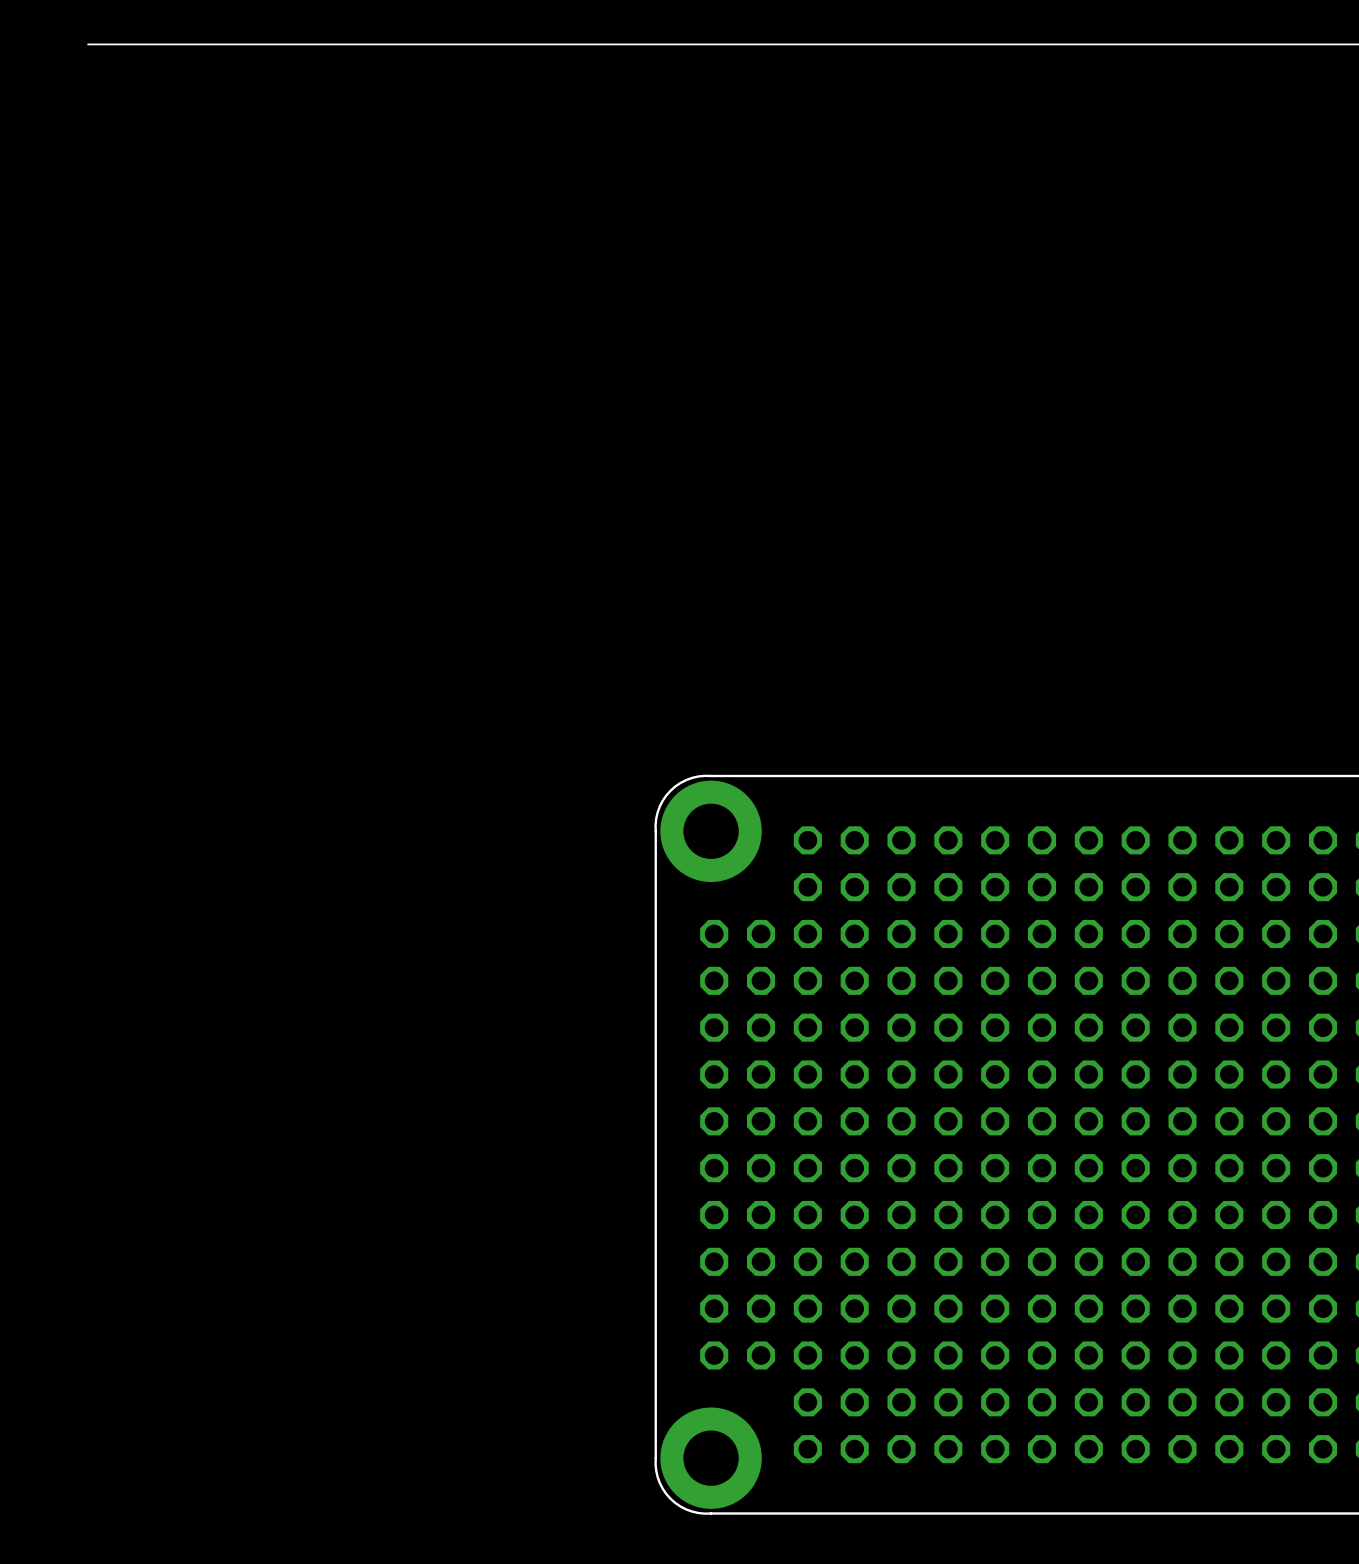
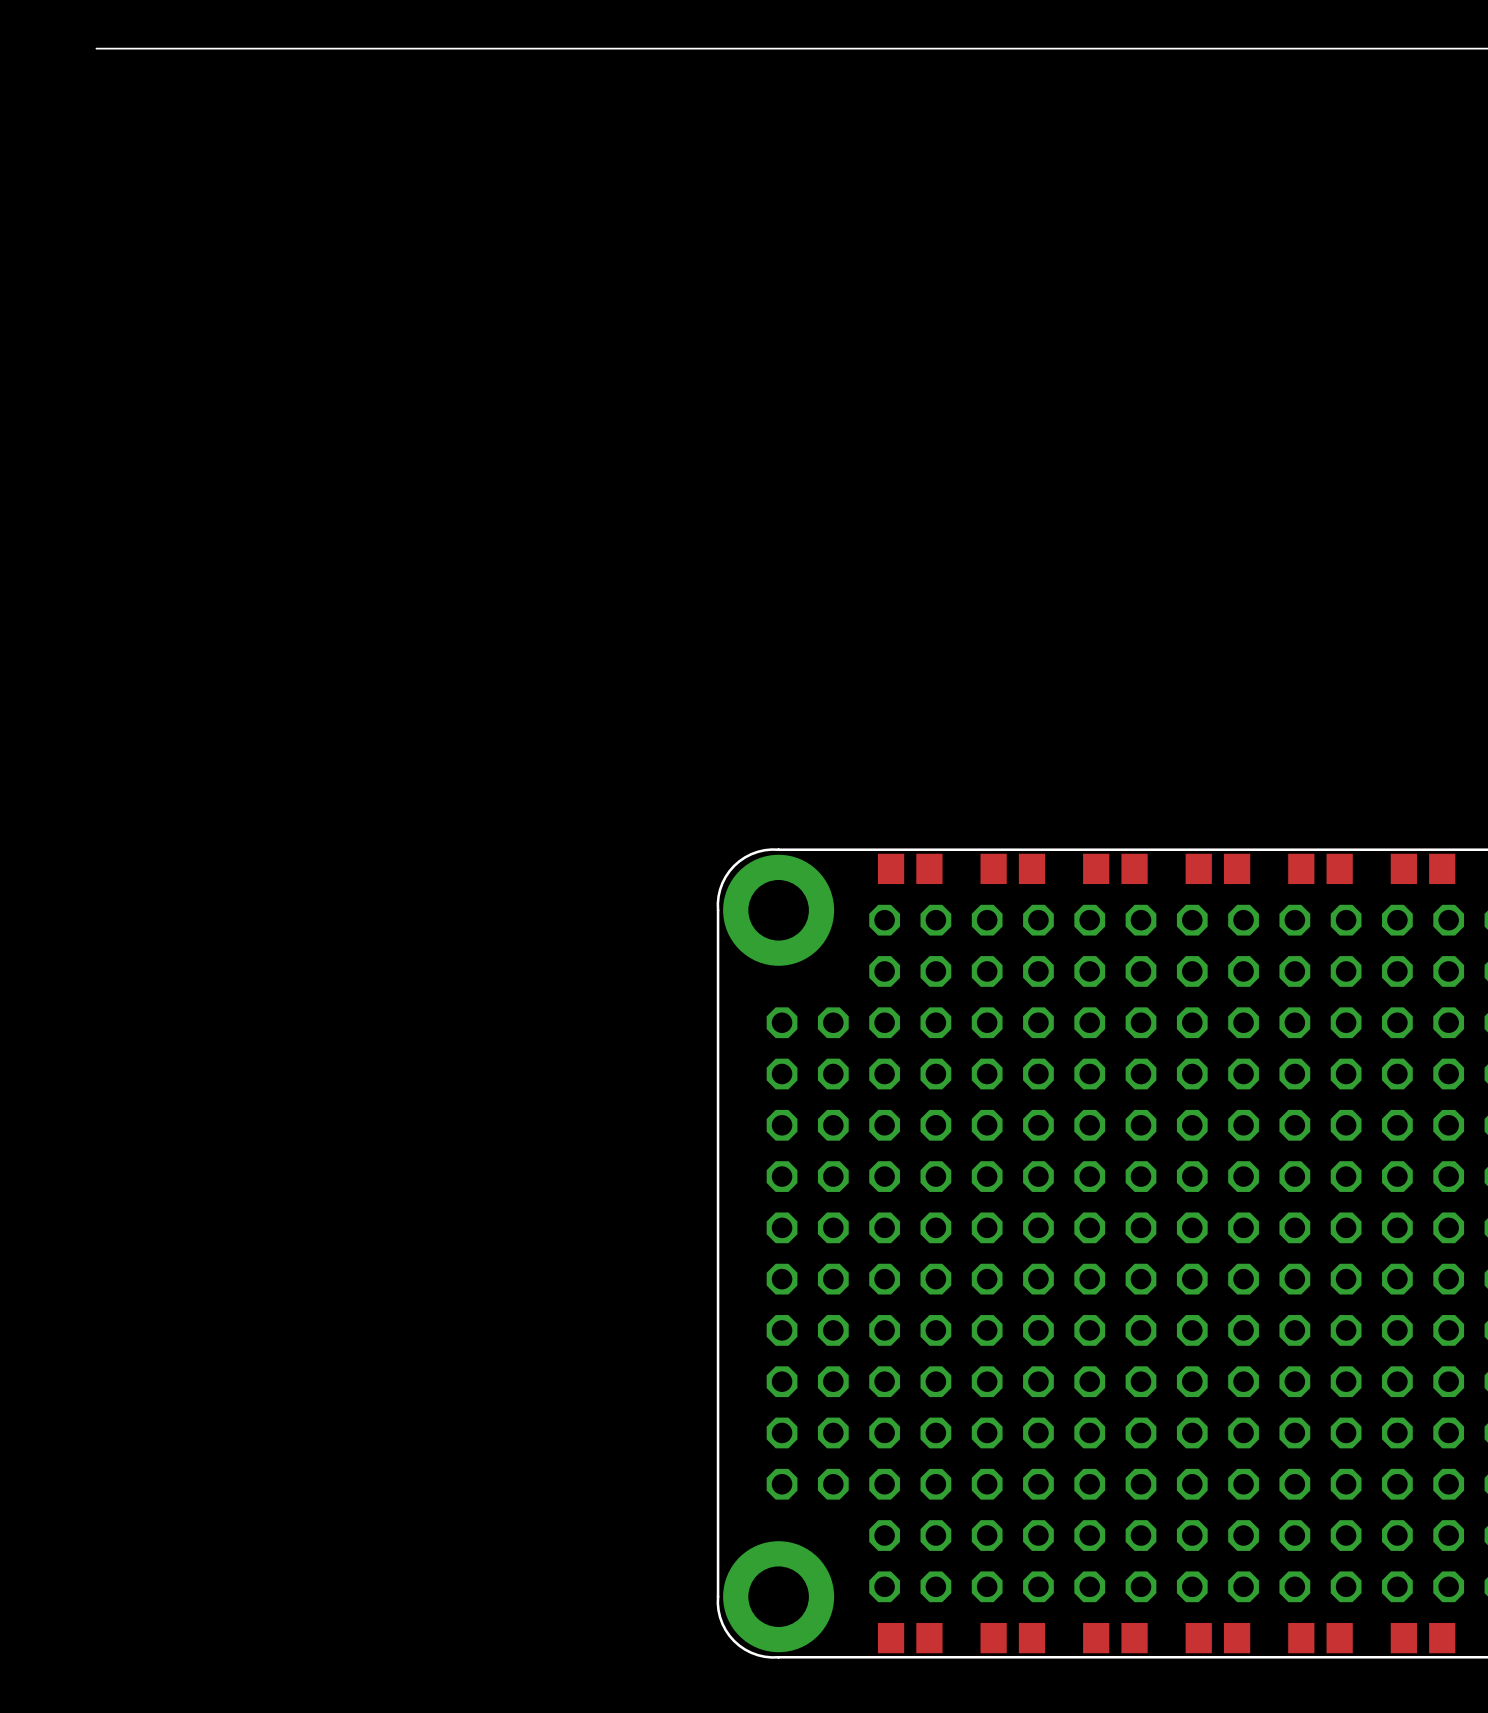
part: none -> (910, 868)
part: none -> (1012, 868)
part: none -> (1115, 868)
part: none -> (1217, 868)
part: none -> (1320, 868)
part: none -> (1423, 868)
part: none -> (910, 1638)
part: none -> (1012, 1638)
part: none -> (1115, 1638)
part: none -> (1217, 1638)
part: none -> (1320, 1638)
part: none -> (1423, 1638)

